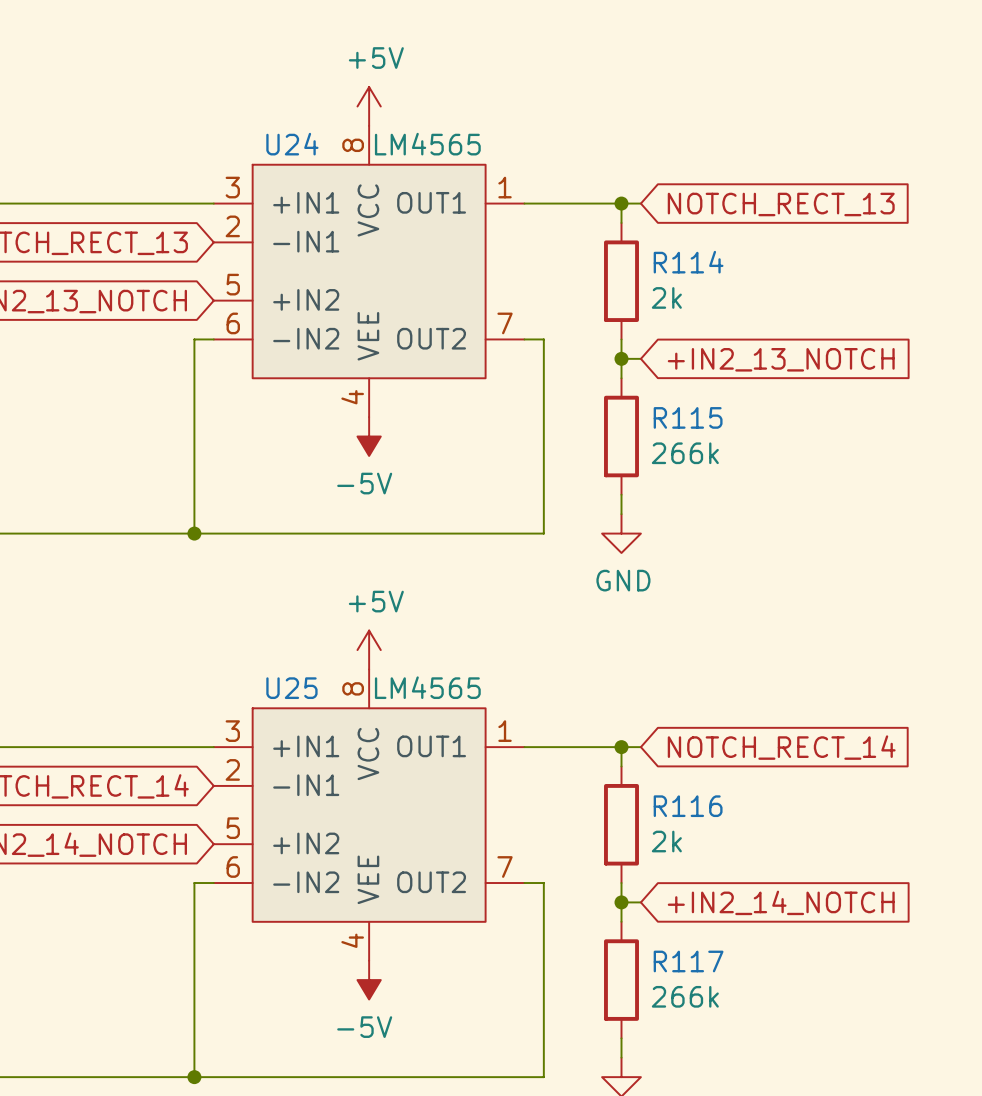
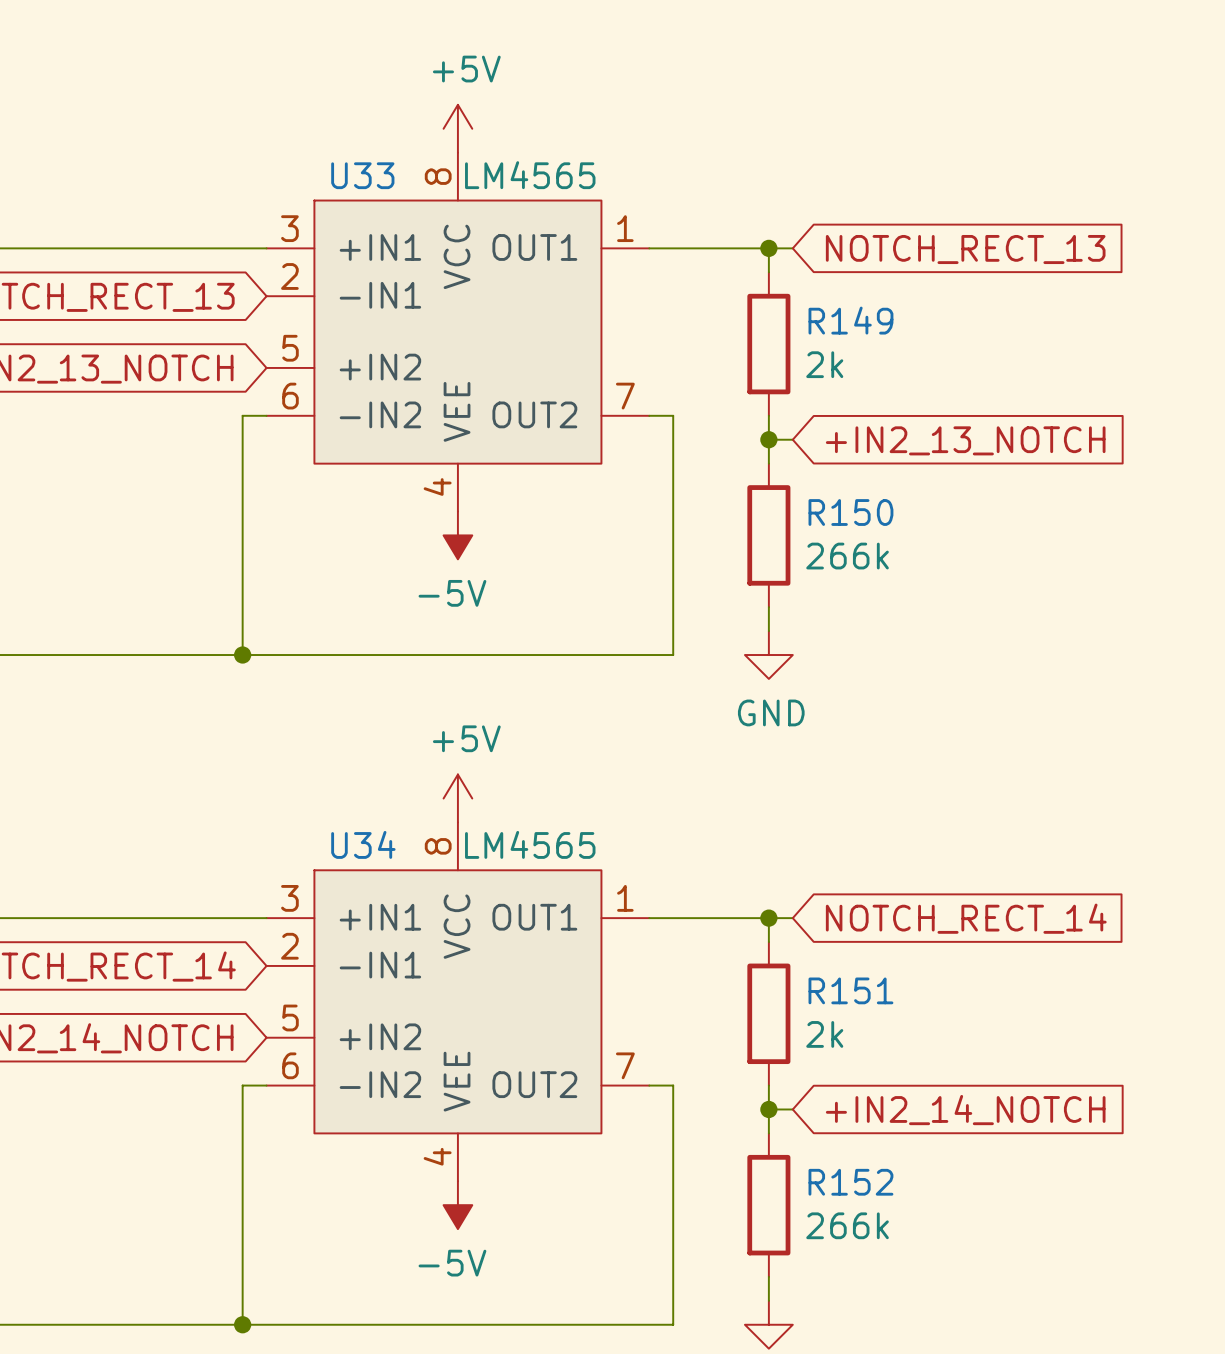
U24 name: U24 (292, 144) -> U33 (362, 175)
R114 name: R114 (688, 262) -> R149 (850, 320)
R115 name: R115 (688, 417) -> R150 (850, 512)
U25 name: U25 (291, 688) -> U34 (363, 844)
R116 name: R116 (688, 806) -> R151 (850, 990)
R117 name: R117 (688, 961) -> R152 (850, 1182)

